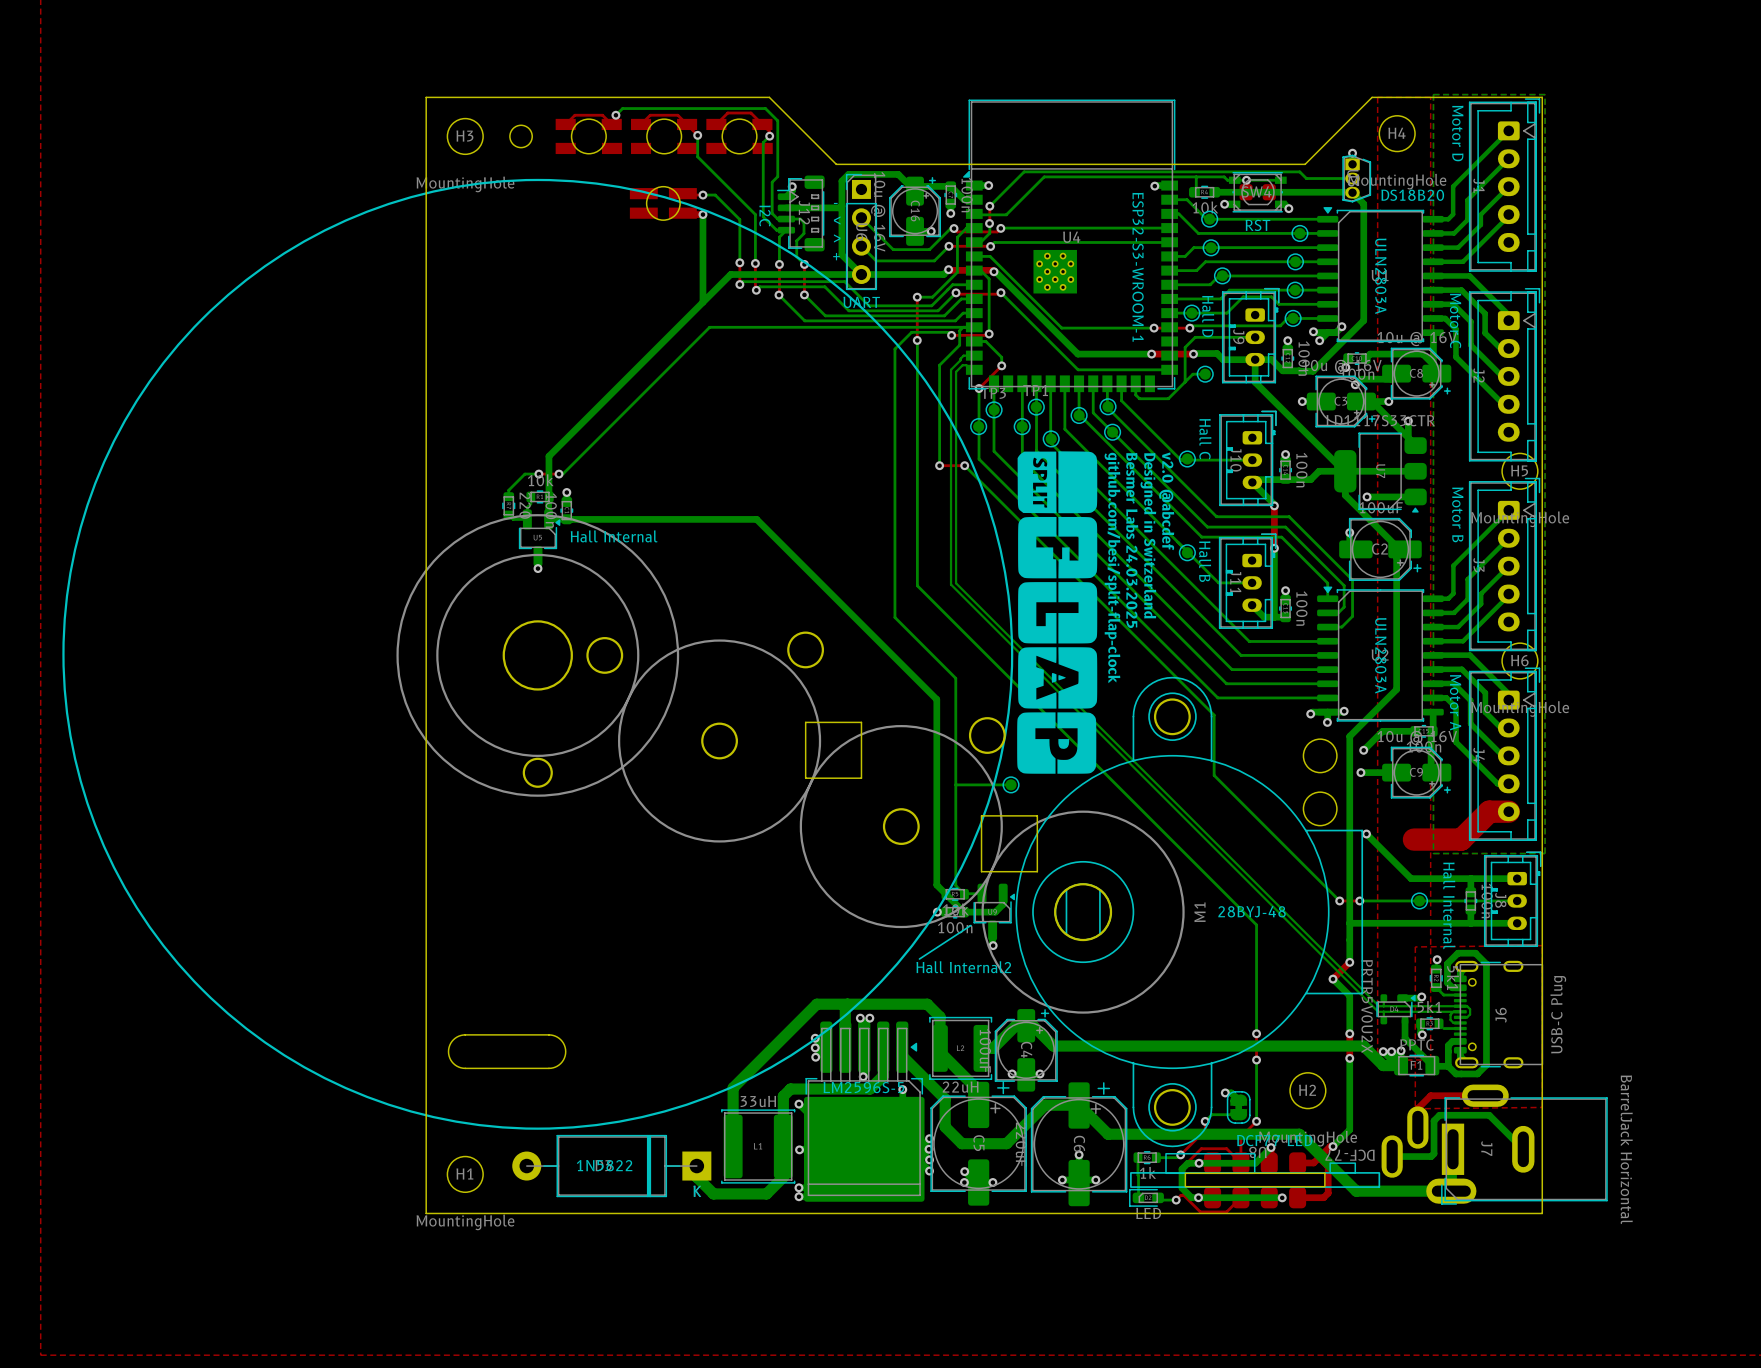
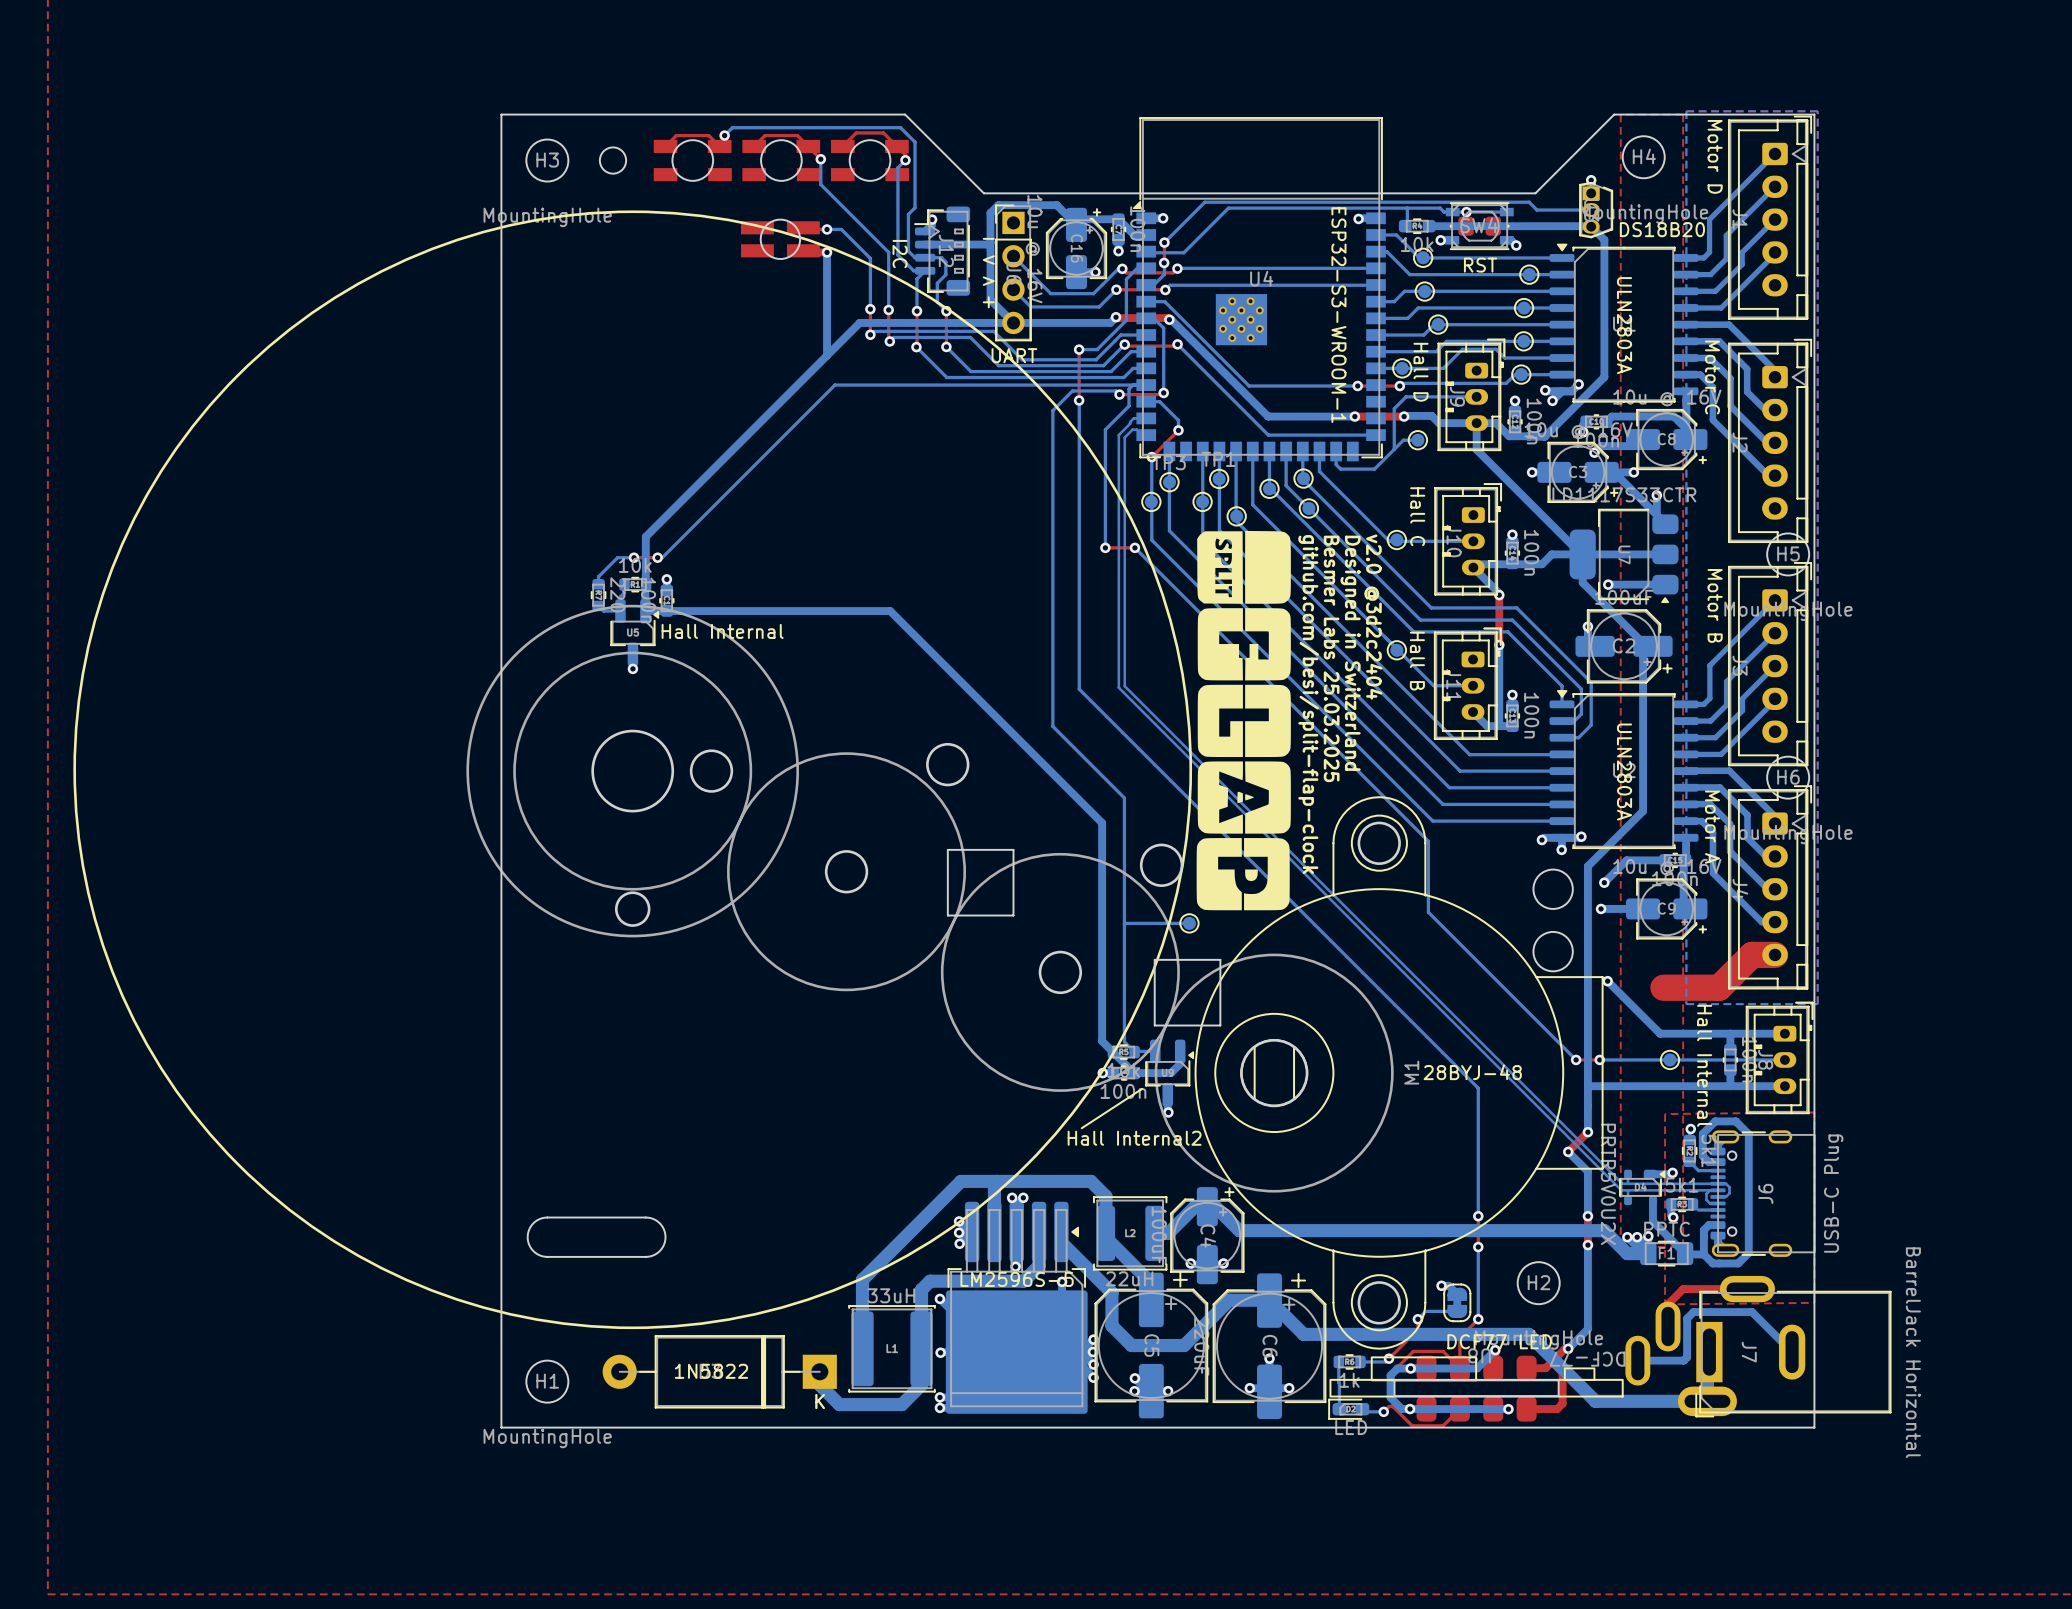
text: v2.0 @abcdef (1166, 501) -> v2.0 @3d2c2404 (1373, 617)
text: Besmer Labs 24.03.2025 (1132, 540) -> Besmer Labs 25.03.2025 (1331, 658)

